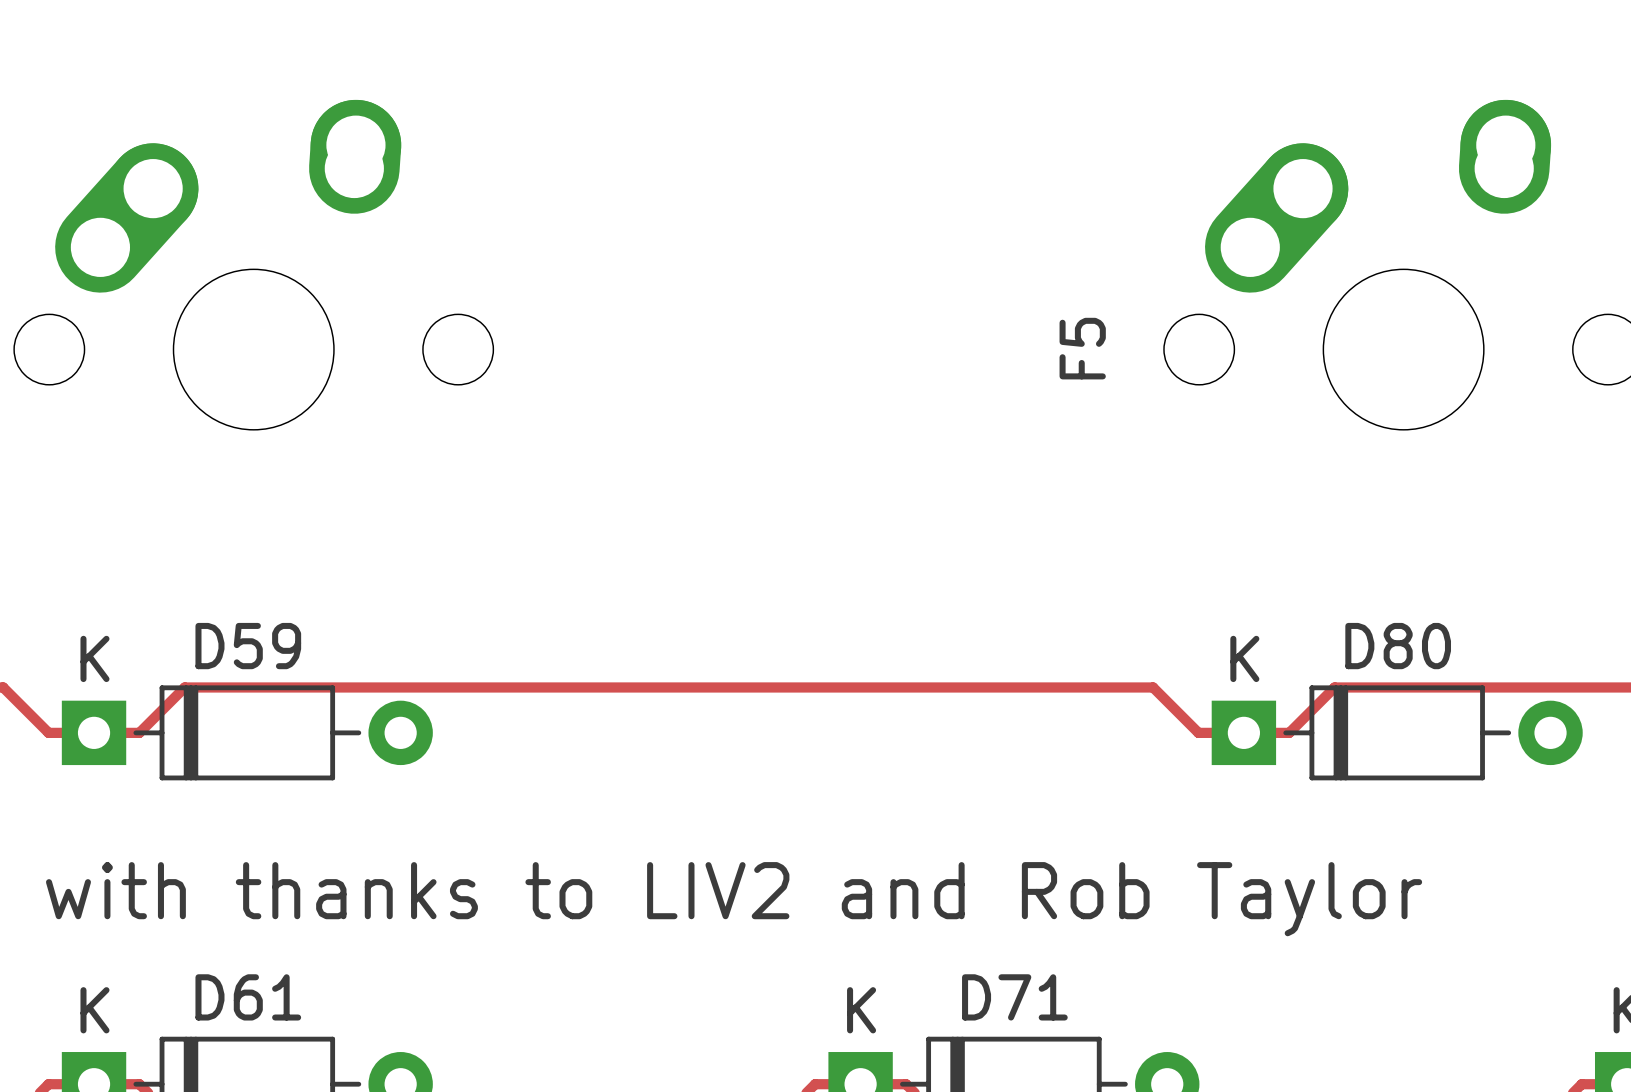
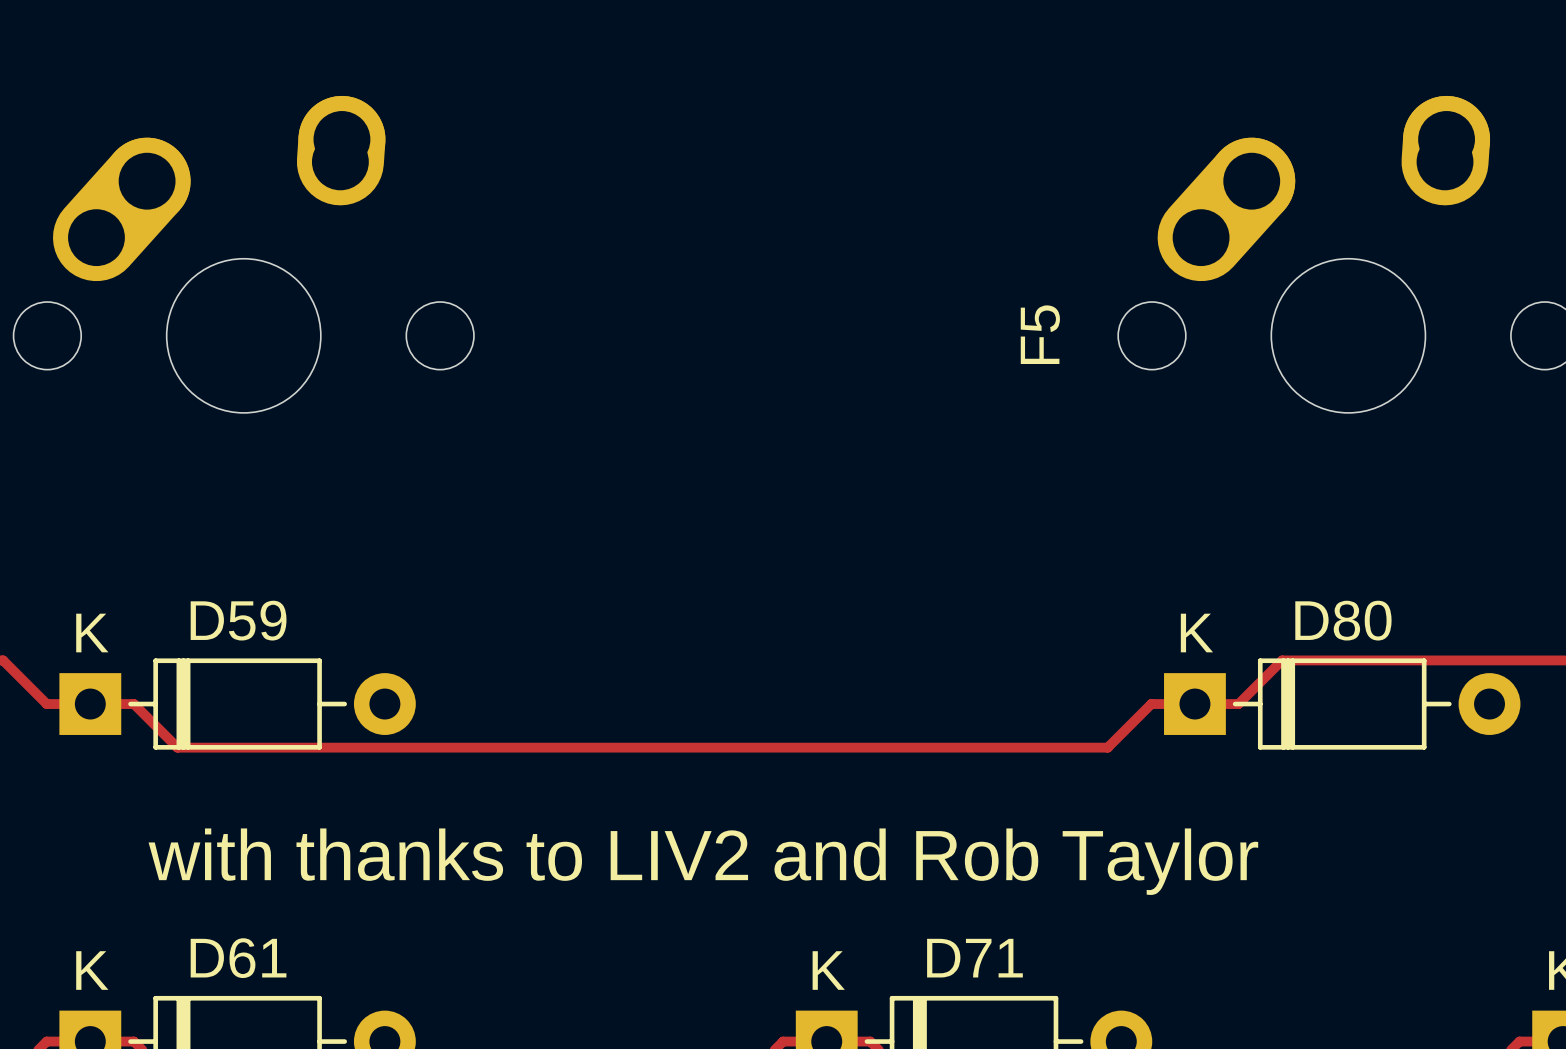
track: (139, 732) (184, 687) (1153, 687) (1198, 732) -> (133, 704) (177, 747) (1107, 747) (1151, 704)

